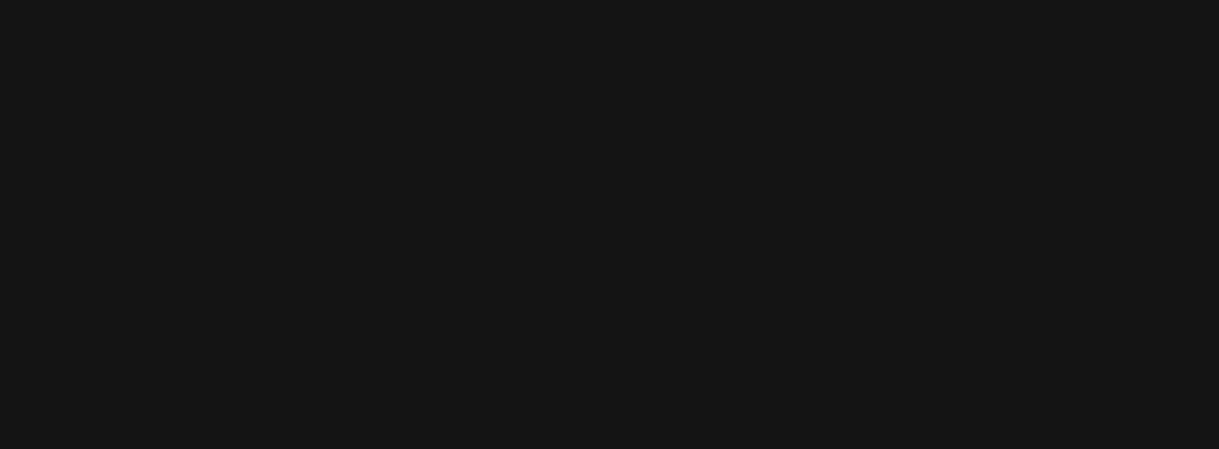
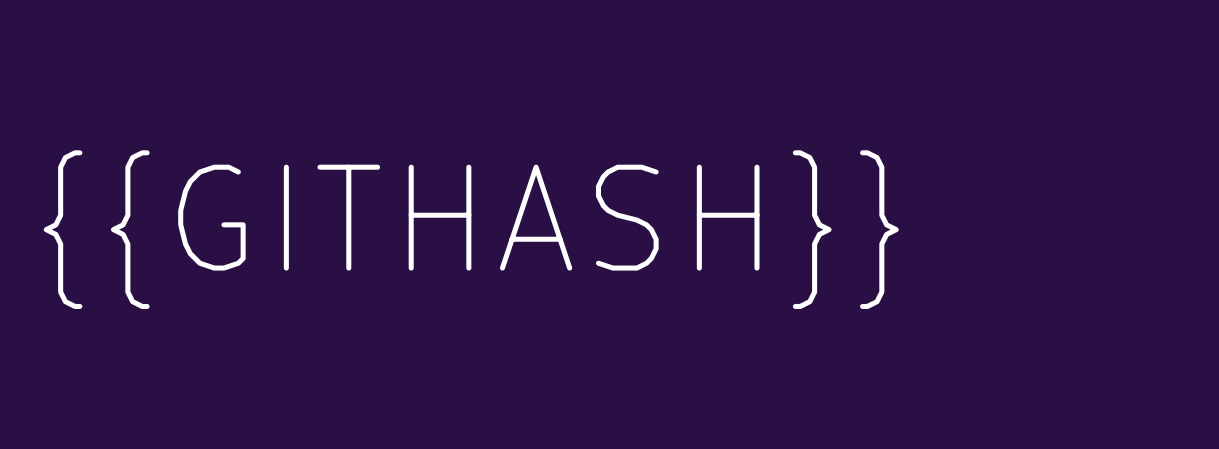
text: none -> {{GITHASH}} (471, 229)

